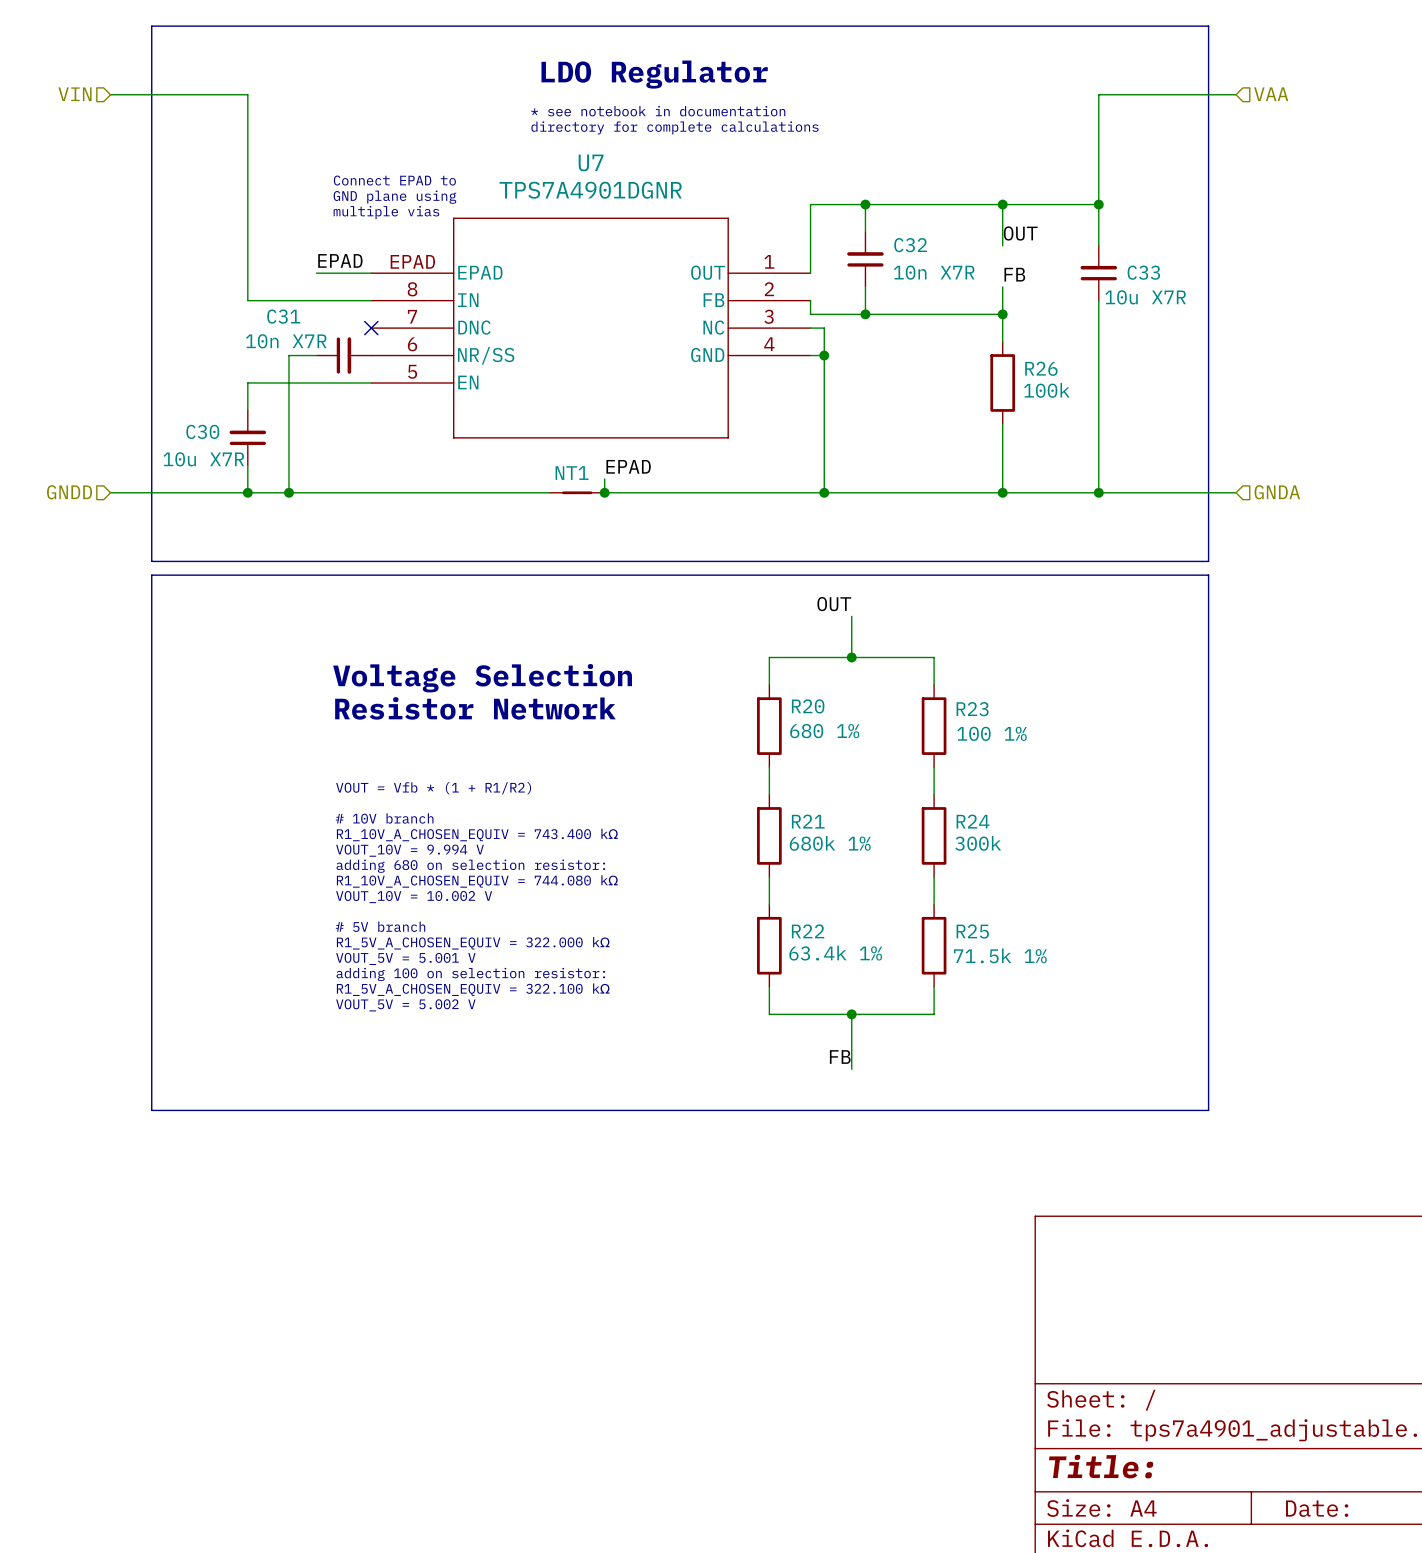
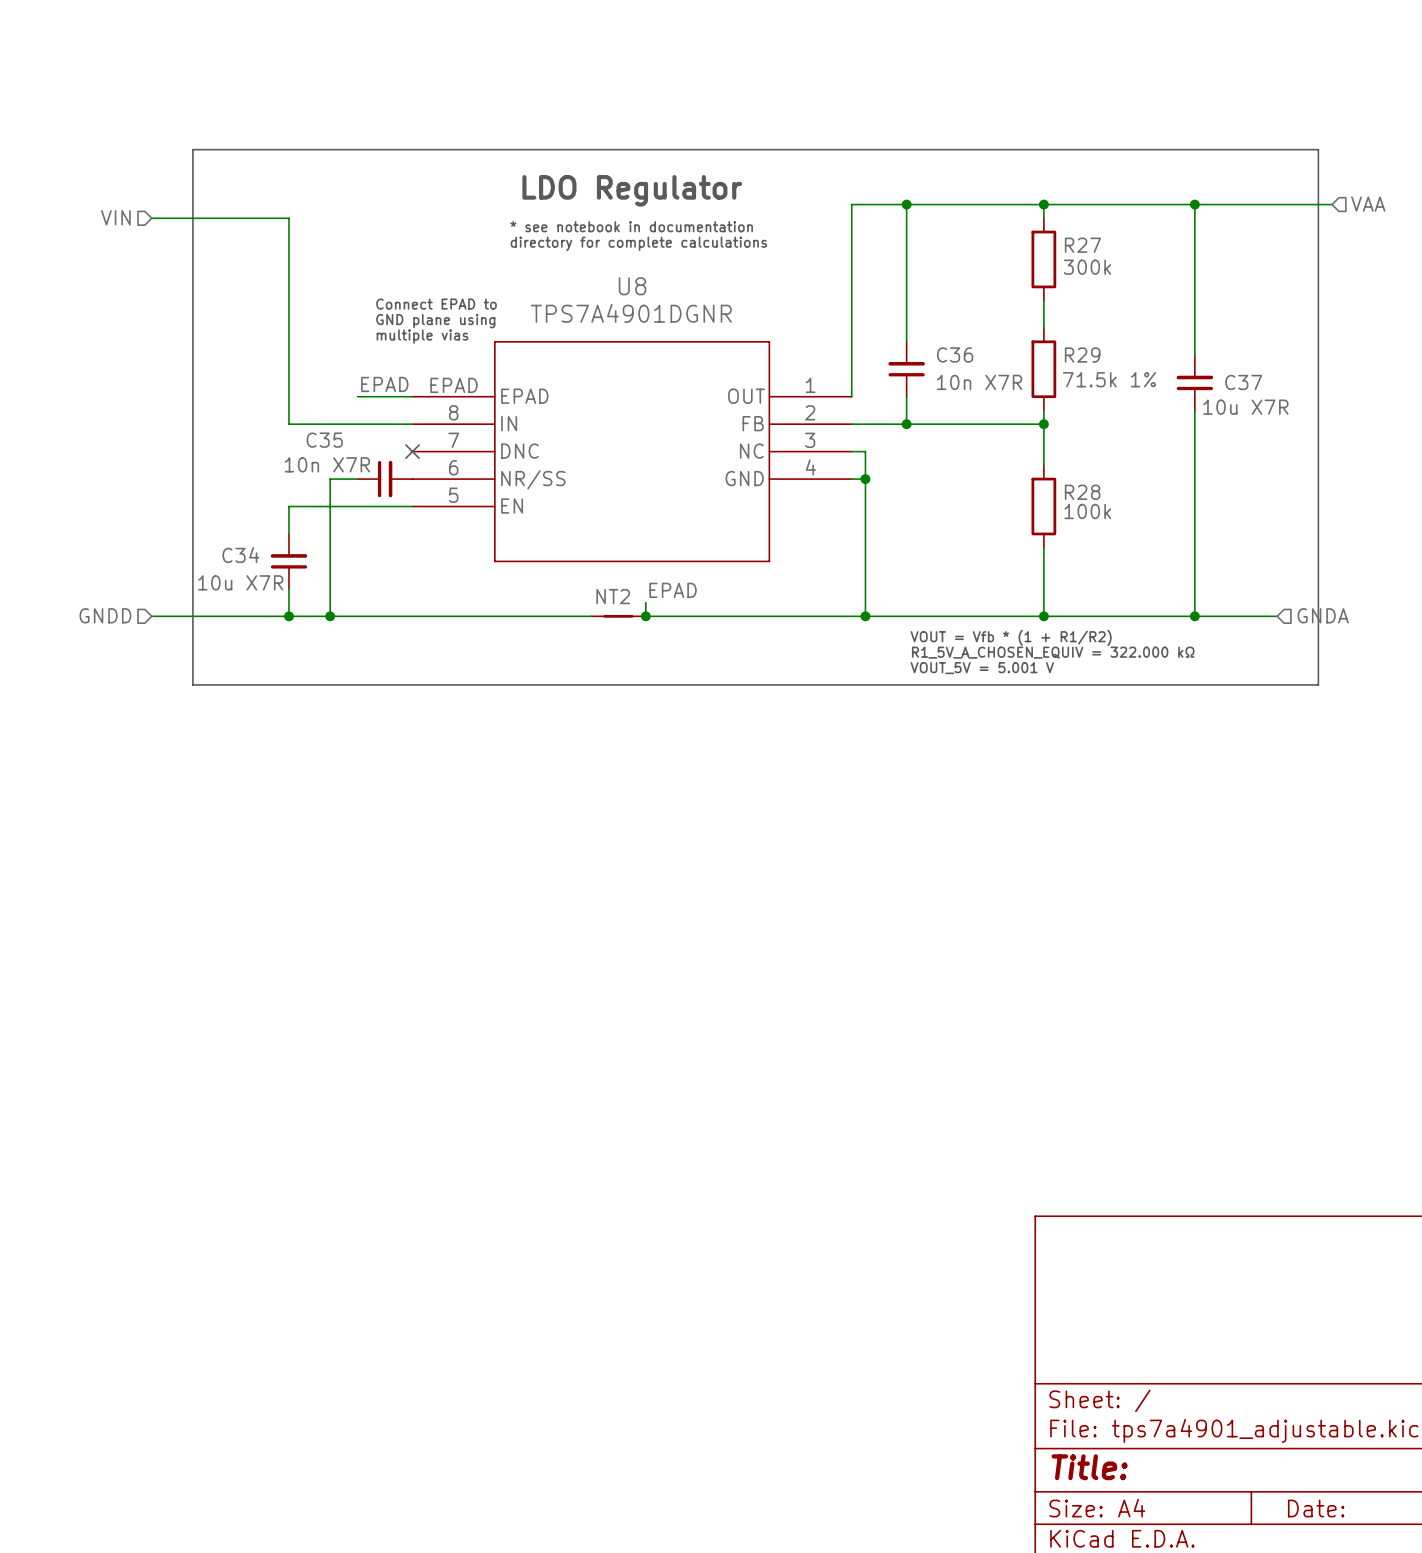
line: (151, 26) (151, 561) (1208, 561) (1208, 26) (151, 26) -> (192, 149) (192, 684) (1318, 684) (1318, 149) (192, 149)
text position: LDO Regulator (654, 74) -> LDO Regulator (632, 190)
hierarchical label position: VIN (74, 94) -> VIN (115, 217)
wire: (110, 94) (247, 94) (247, 300) (371, 300) -> none
wire: (1236, 94) (1098, 94) (1098, 245) -> none
hierarchical label position: VAA (1271, 94) -> VAA (1368, 204)
text position: * see notebook in documentation (658, 111) -> * see notebook in documentation (631, 226)
text position: directory for complete calculations (674, 127) -> directory for complete calculations (638, 243)
text position: Connect EPAD to (394, 180) -> Connect EPAD to (436, 304)
text position: GND plane using (394, 197) -> GND plane using (435, 321)
wire: (851, 204) (810, 204) (810, 273) -> (851, 204) (851, 396)
wire: (865, 204) (865, 232) -> (1043, 300) (1043, 328)
junction position: (865, 204) -> (906, 204)
wire: none -> (906, 204) (906, 341)
wire: (1002, 204) (1002, 245) -> none
junction: (1002, 204) -> none
wire: none -> (1043, 204) (1043, 218)
junction: none -> (1043, 204)
wire: none -> (1098, 204) (1332, 204)
junction: (1098, 204) -> none
wire: none -> (1194, 204) (1194, 355)
junction: none -> (1194, 204)
text position: multiple vias (386, 212) -> multiple vias (422, 336)
label: OUT (1020, 233) -> none
C32: 10n X7R (865, 259) -> none
R27: none -> 300k (1043, 259)
label: EPAD (340, 260) -> none
wire: (316, 273) (371, 273) -> (357, 396) (412, 396)
C33: 10u X7R (1098, 273) -> none
label: FB (1014, 274) -> none
wire: (865, 286) (865, 314) -> (906, 396) (906, 424)
wire: (1002, 286) (1002, 341) -> (1043, 410) (1043, 465)
wire: (810, 300) (810, 314) (1002, 314) -> none
wire: (1098, 300) (1098, 492) -> none
junction: (865, 314) -> none
junction: (1002, 314) -> none
no-connect mark: (371, 328) -> none
U7: TPS7A4901DGNR (590, 328) -> none
wire: (810, 328) (824, 328) (824, 492) -> (851, 451) (865, 451) (865, 616)
wire: (288, 355) (316, 355) -> (288, 355) (288, 218) (151, 218)
C31: 10n X7R (343, 355) -> none
wire: (810, 355) (824, 355) -> (851, 479) (865, 479)
junction: (824, 355) -> none
C36: none -> 10n X7R (906, 369)
R29: none -> 71.5k 1% (1043, 369)
wire: (371, 382) (247, 382) (247, 410) -> (412, 506) (288, 506) (288, 533)
R26: 100k (1002, 382) -> none
C37: none -> 10u X7R (1194, 382)
label: none -> EPAD (384, 384)
wire: none -> (1194, 410) (1194, 616)
wire: (288, 424) (288, 492) -> (288, 424) (412, 424)
wire: none -> (851, 424) (1043, 424)
junction: none -> (906, 424)
wire: (1002, 424) (1002, 492) -> (1043, 547) (1043, 616)
junction: none -> (1043, 424)
C30: 10u X7R (247, 437) -> none
no-connect mark: none -> (412, 451)
U8: none -> TPS7A4901DGNR (632, 451)
wire: (247, 465) (247, 492) -> (288, 588) (288, 616)
label: EPAD (628, 466) -> none
wire: none -> (357, 479) (330, 479) (330, 616)
C35: none -> 10n X7R (385, 479)
wire: (604, 479) (604, 492) (1236, 492) -> (645, 602) (645, 616) (1277, 616)
hierarchical label position: GNDD (69, 492) -> GNDD (105, 615)
wire: (110, 492) (549, 492) -> (151, 616) (590, 616)
junction: (247, 492) -> none
junction: (288, 492) -> none
NT1: (577, 492) -> none
junction: (604, 492) -> none
junction position: (824, 492) -> (865, 479)
junction: (1002, 492) -> none
junction: (1098, 492) -> none
hierarchical label position: GNDA (1277, 492) -> GNDA (1323, 615)
R28: none -> 100k (1043, 506)
C34: none -> 10u X7R (288, 561)
line: (151, 575) (1208, 575) (1208, 1110) (151, 1110) (151, 575) -> none
label: none -> EPAD (673, 590)
label: OUT (834, 604) -> none
junction: none -> (288, 616)
junction: none -> (330, 616)
NT2: none -> (618, 616)
junction: none -> (645, 616)
wire: (851, 616) (851, 657) -> none
junction: none -> (1043, 616)
junction: none -> (1194, 616)
text: none -> VOUT = Vfb * (1 + R1/R2) (1011, 637)
text: none -> R1_5V_A_CHOSEN_EQUIV = 322.000 kΩ (1053, 652)
junction position: (851, 657) -> (865, 616)
text: none -> VOUT_5V = 5.001 V (982, 668)
text: Voltage Selection (482, 678) -> none
wire: (769, 684) (769, 657) (934, 657) (934, 684) -> none
text: Resistor Network (475, 708) -> none
R20: 680 1% (769, 726) -> none
R23: 100 1% (934, 726) -> none
wire: (769, 767) (769, 794) -> none
wire: (934, 767) (934, 794) -> none
text: VOUT = Vfb * (1 + R1/R2) (433, 788) -> none
text: # 10V branch (384, 818) -> none
text: R1_10V_A_CHOSEN_EQUIV = 743.400 kΩ (477, 835) -> none
R21: 680k 1% (769, 835) -> none
R24: 300k (934, 835) -> none
text: VOUT_10V = 9.994 V (409, 850) -> none
text: adding 680 on selection resistor: (470, 866) -> none
wire: (769, 877) (769, 904) -> none
wire: (934, 877) (934, 904) -> none
text: R1_10V_A_CHOSEN_EQUIV = 744.080 kΩ (477, 881) -> none
text: VOUT_10V = 10.002 V (414, 897) -> none
text: # 5V branch (380, 926) -> none
text: R1_5V_A_CHOSEN_EQUIV = 322.000 kΩ (473, 943) -> none
R22: 63.4k 1% (769, 945) -> none
R25: 71.5k 1% (934, 945) -> none
text: VOUT_5V = 5.001 V (405, 958) -> none
text: adding 100 on selection resistor: (470, 974) -> none
wire: (769, 986) (769, 1014) (934, 1014) (934, 986) -> none
text: R1_5V_A_CHOSEN_EQUIV = 322.100 kΩ (473, 989) -> none
text: VOUT_5V = 5.002 V (405, 1005) -> none
wire: (851, 1014) (851, 1069) -> none
junction: (851, 1014) -> none
label: FB (840, 1057) -> none

